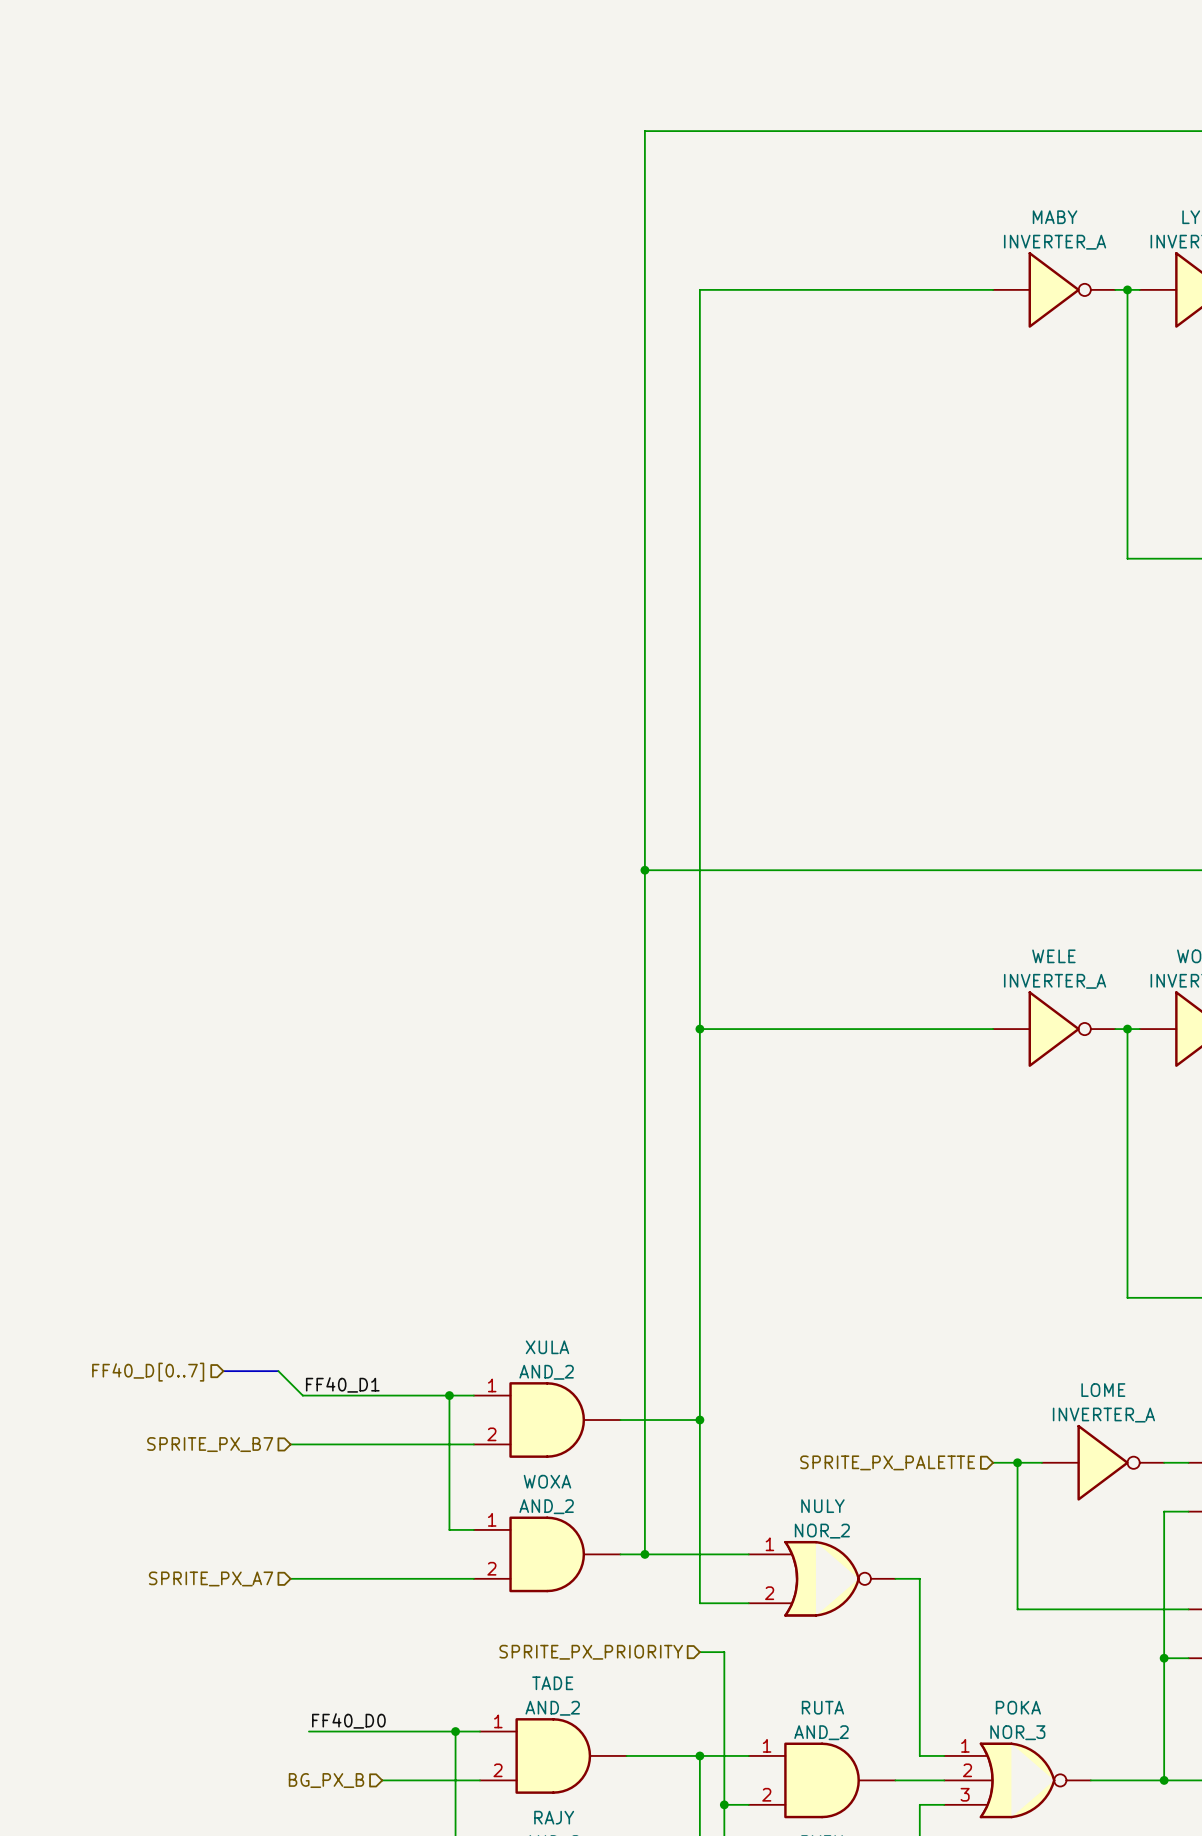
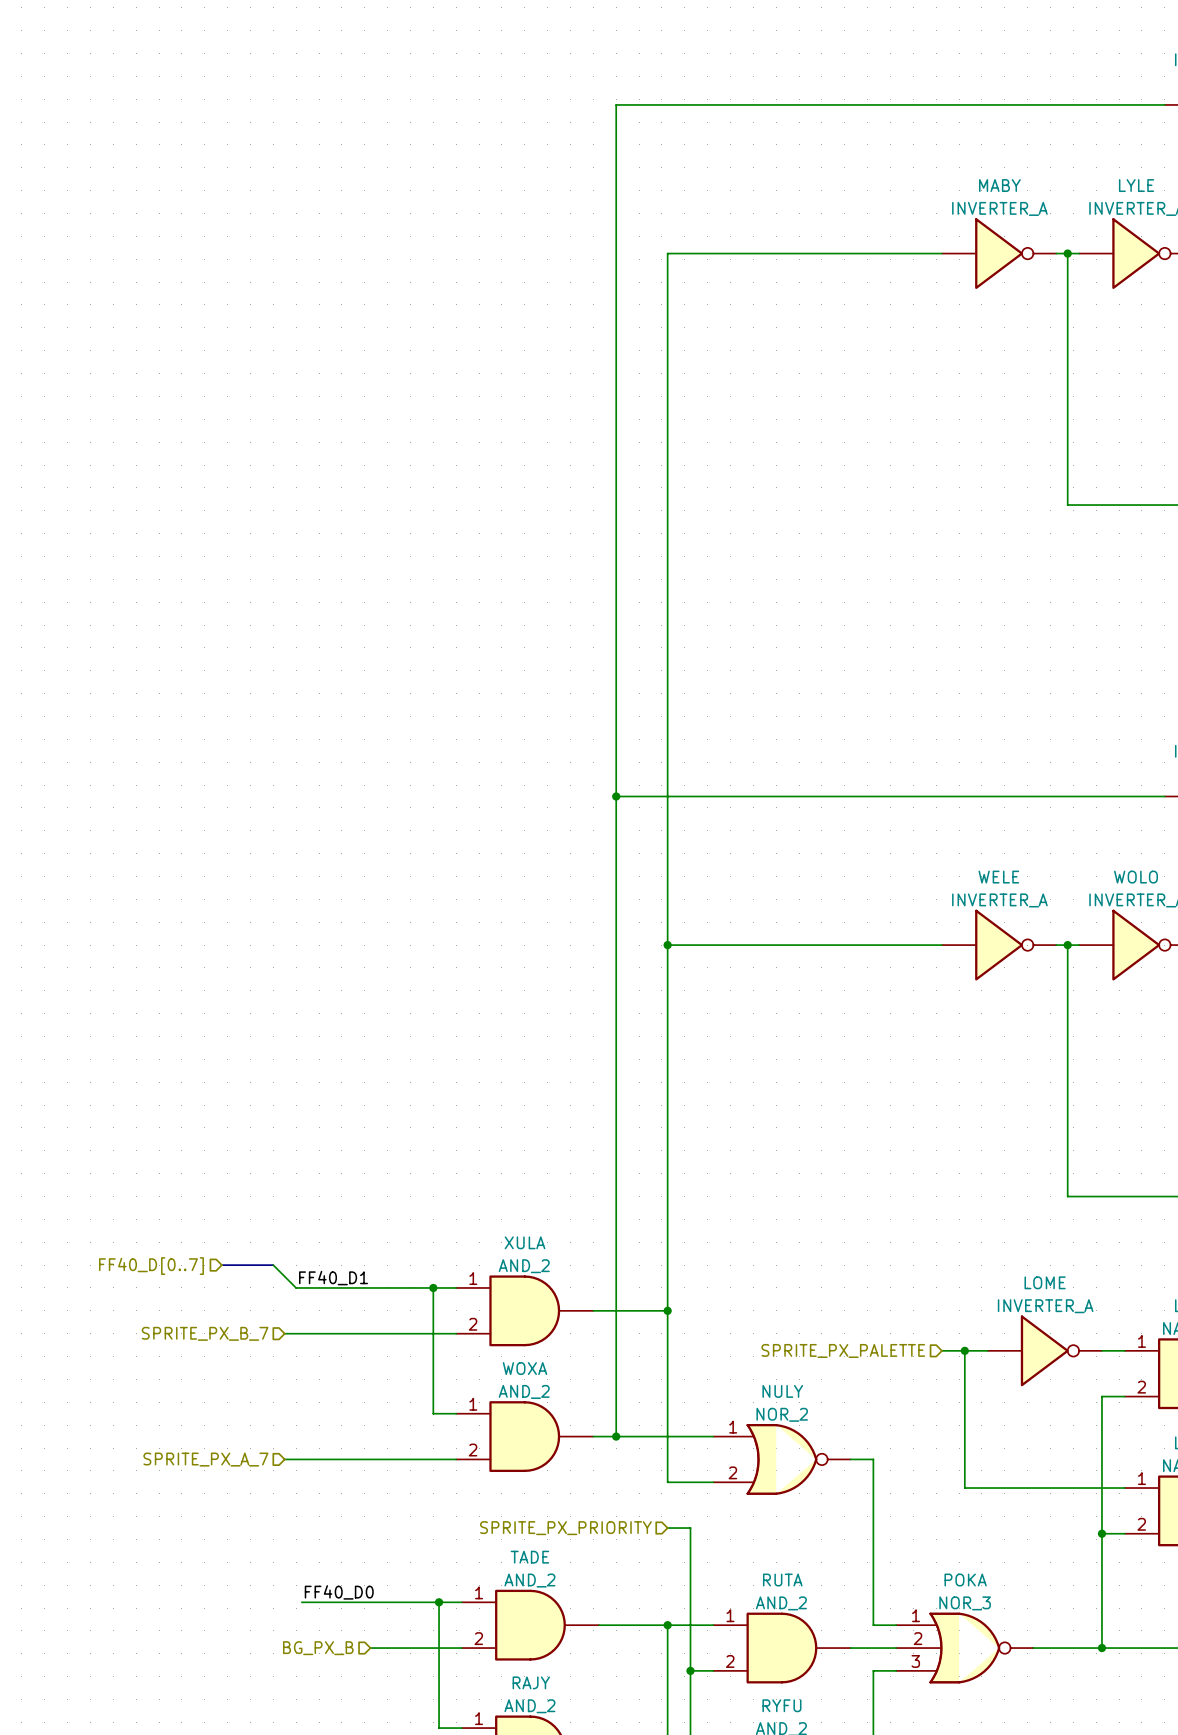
hierarchical label: SPRITE_PX_B7 (210, 1444) -> SPRITE_PX_B_7 (205, 1333)
hierarchical label: SPRITE_PX_A7 (211, 1578) -> SPRITE_PX_A_7 (205, 1459)

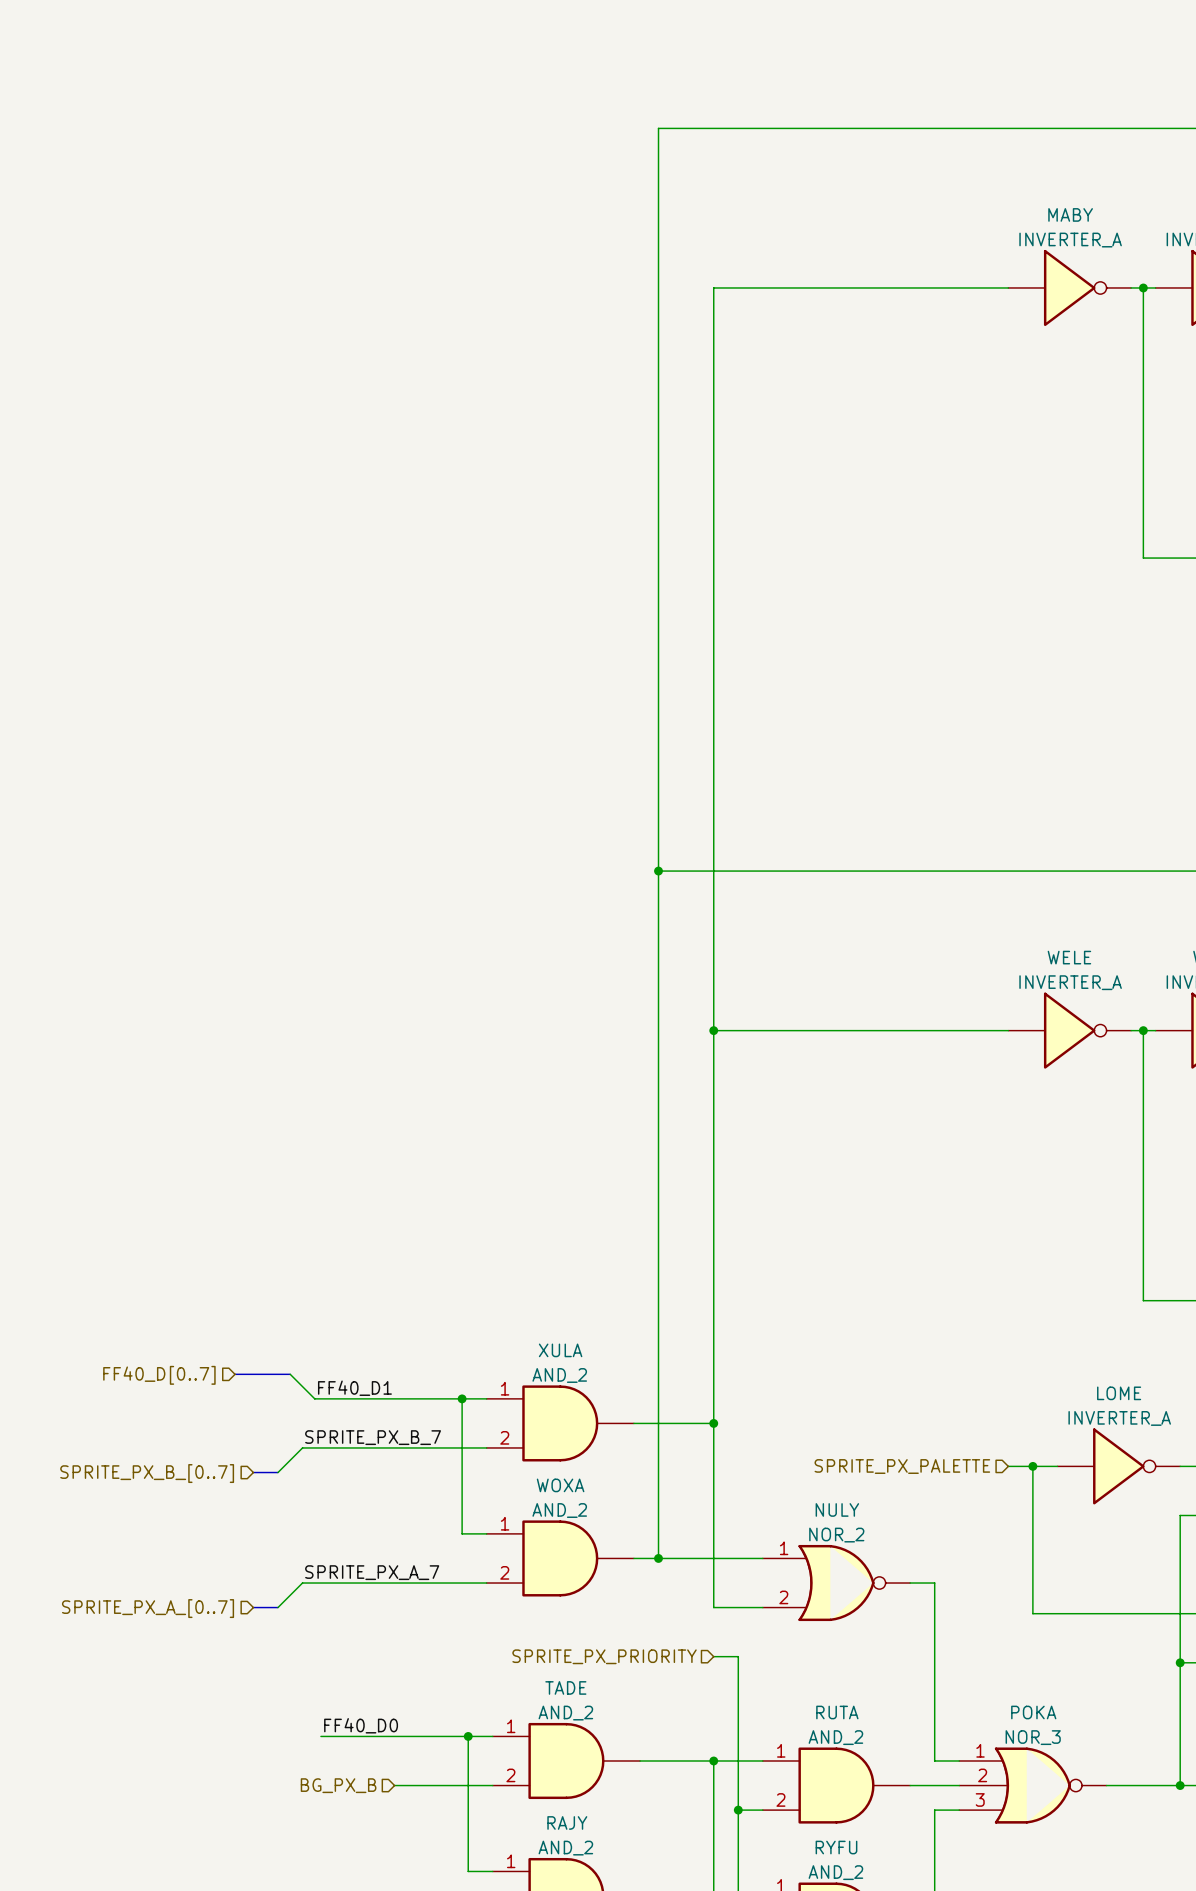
label: none -> SPRITE_PX_B_7 (373, 1437)
hierarchical label: SPRITE_PX_B_7 (205, 1333) -> SPRITE_PX_B_[0..7] (147, 1473)
wire: none -> (302, 1447) (277, 1472)
bus: none -> (253, 1472) (277, 1472)
label: none -> SPRITE_PX_A_7 (372, 1572)
hierarchical label: SPRITE_PX_A_7 (205, 1459) -> SPRITE_PX_A_[0..7] (148, 1608)
wire: none -> (302, 1583) (277, 1607)
bus: none -> (253, 1607) (277, 1607)

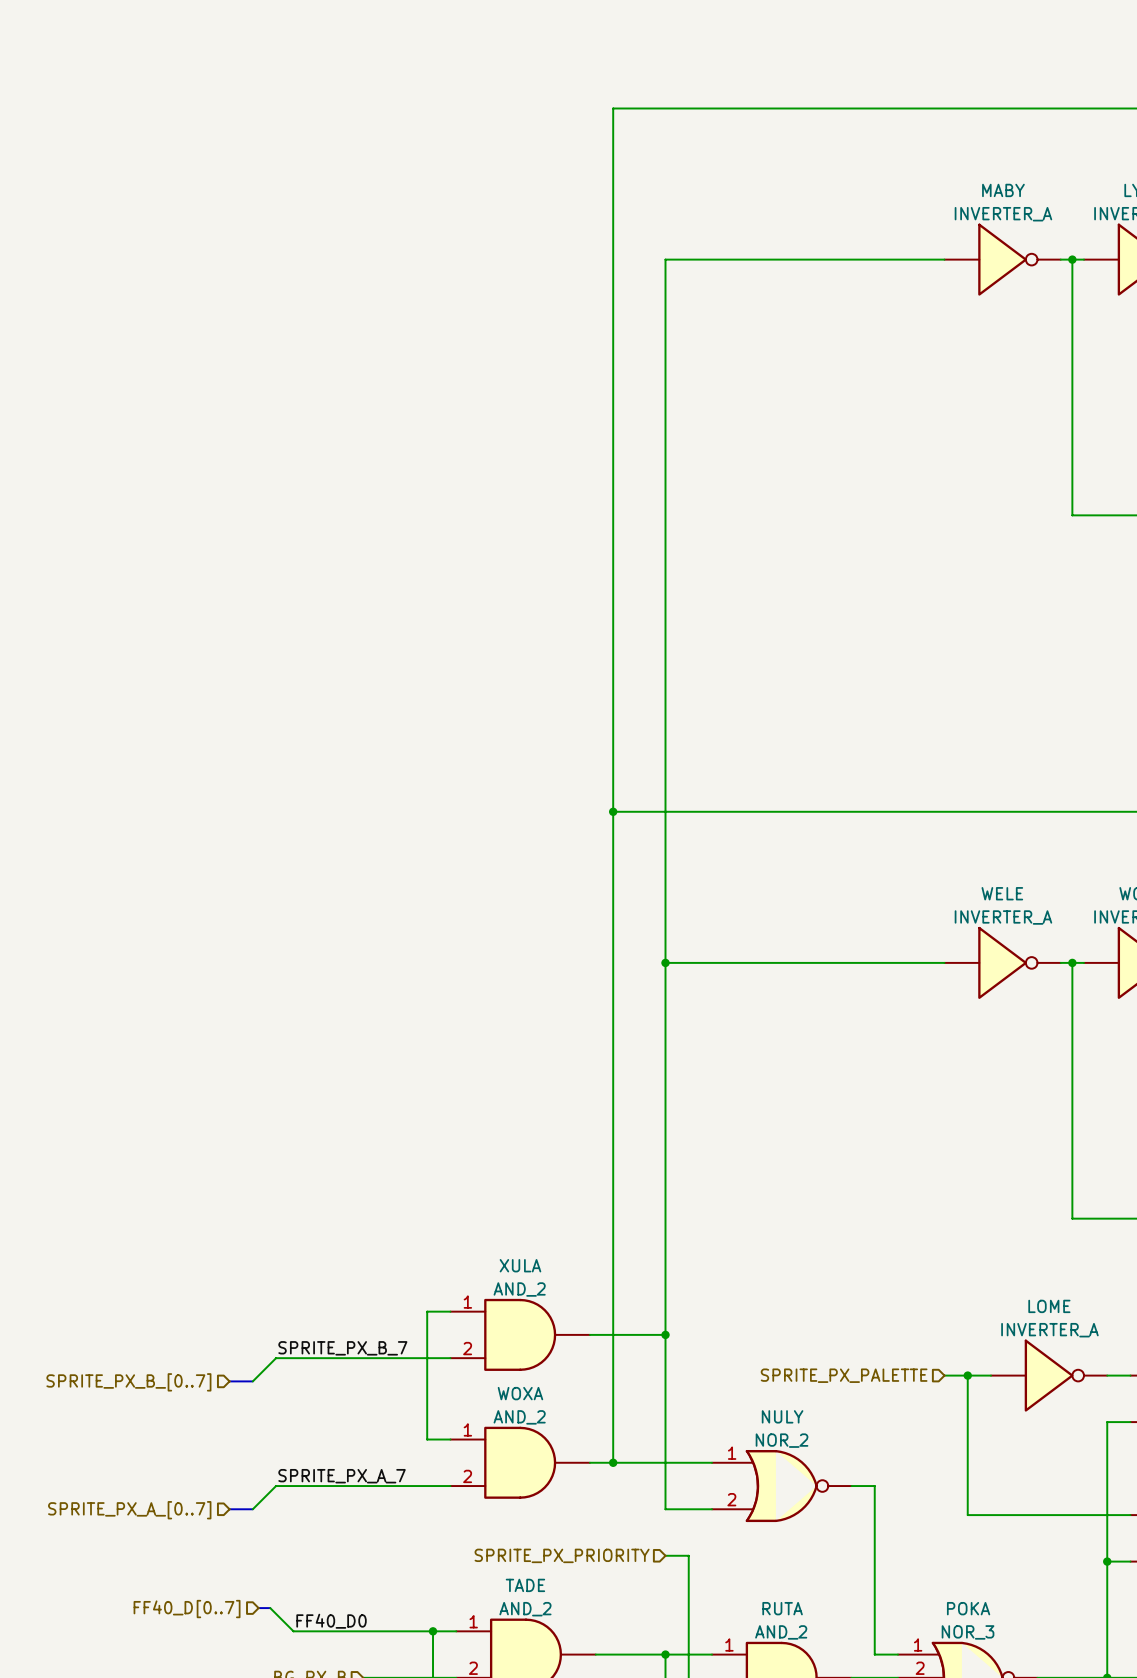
bus: (235, 1374) (290, 1374) -> none
wire: (290, 1374) (314, 1398) (462, 1398) -> none
hierarchical label: FF40_D[0..7] (159, 1375) -> none
label: FF40_D1 (354, 1388) -> none
junction: (462, 1398) -> none
bus: none -> (258, 1608) (270, 1608)
wire: none -> (270, 1608) (293, 1631)
hierarchical label: none -> FF40_D[0..7] (187, 1609)

